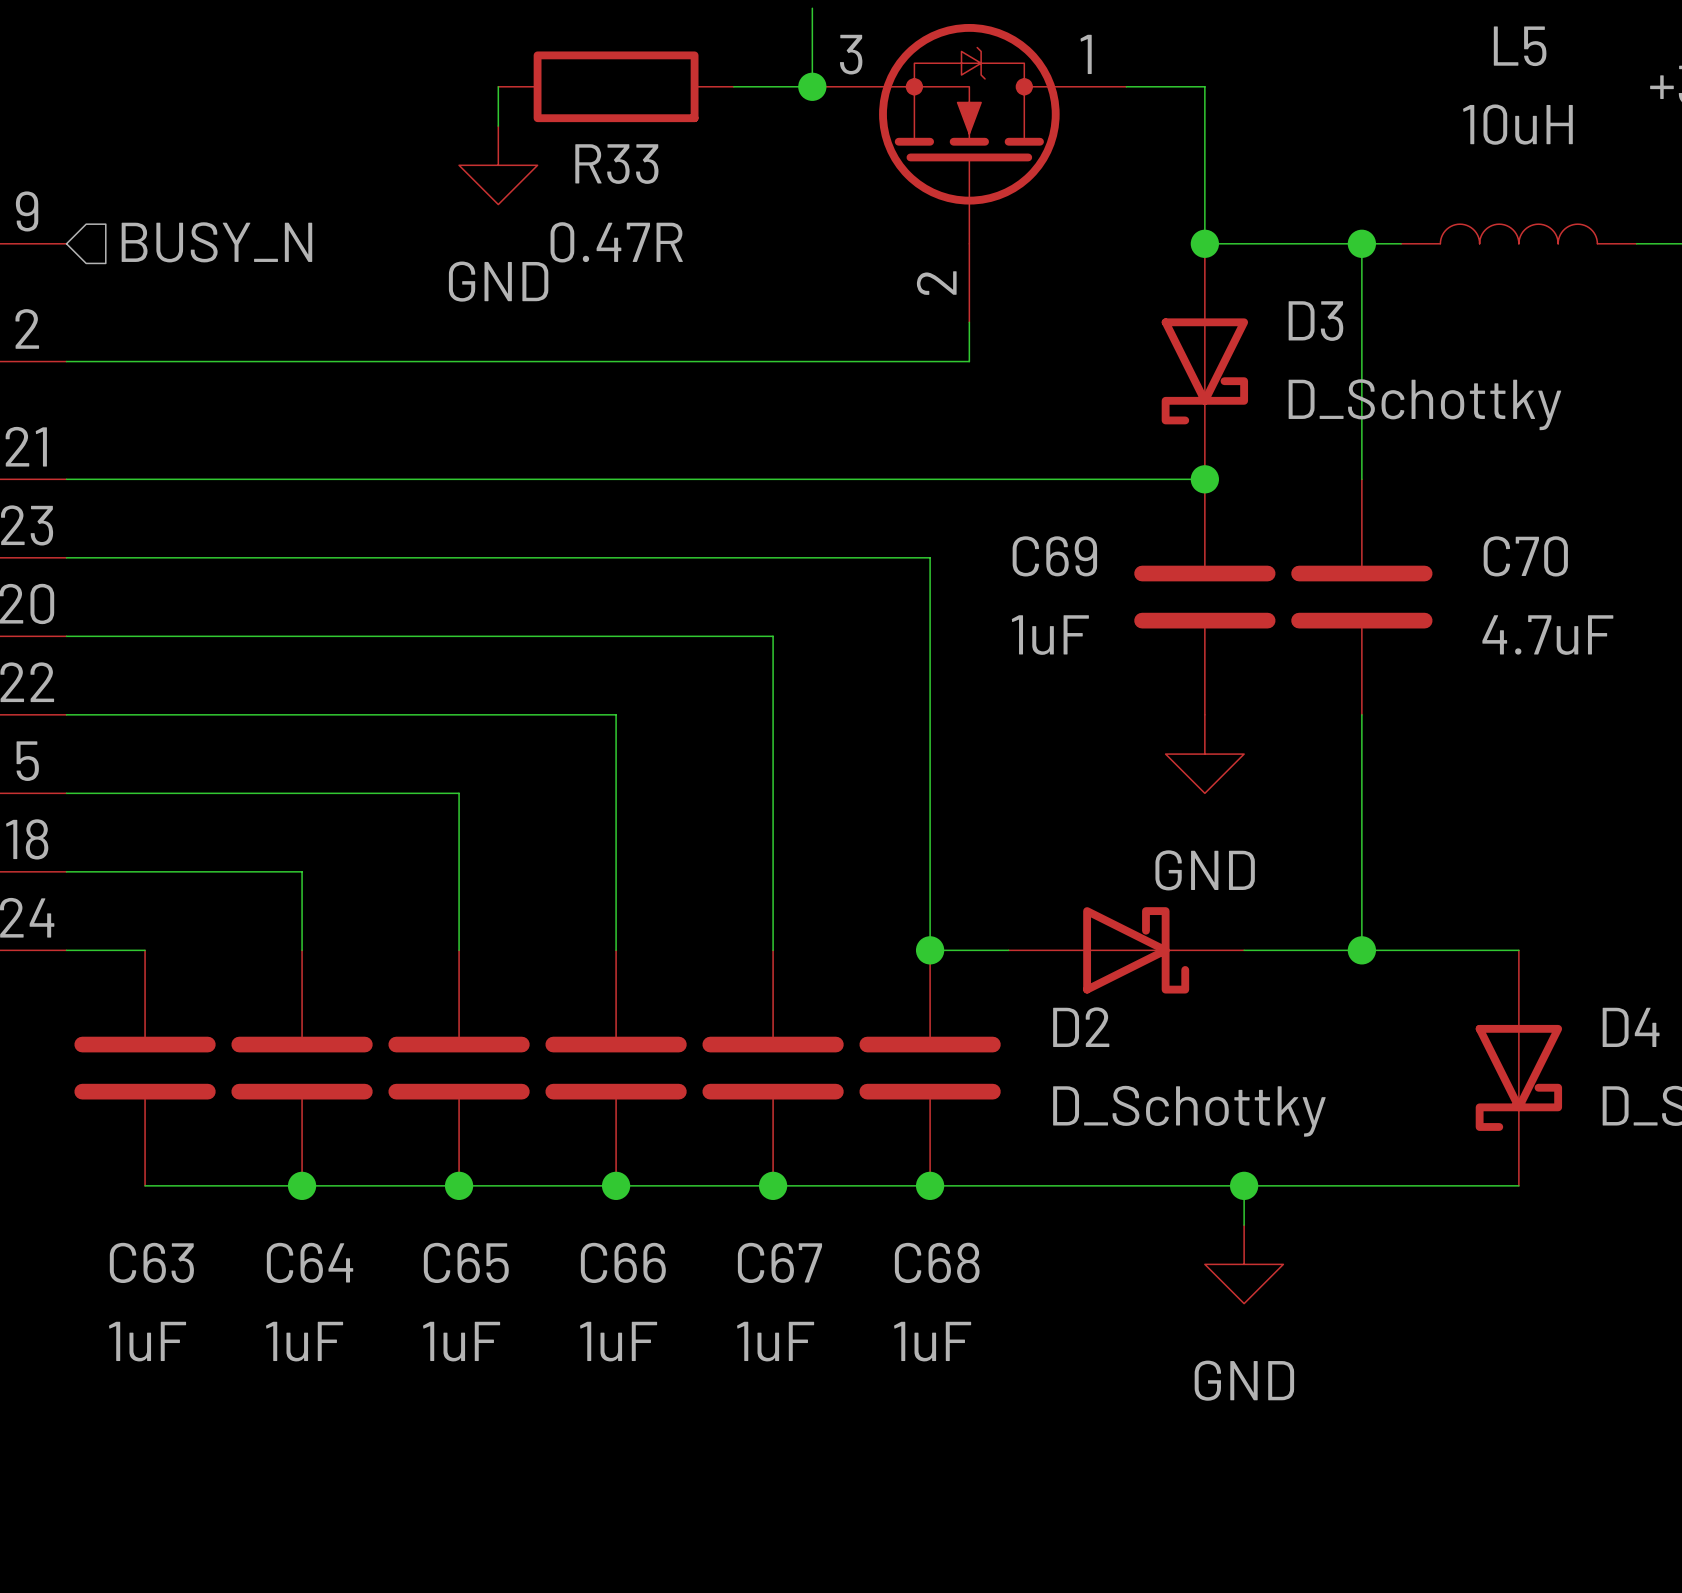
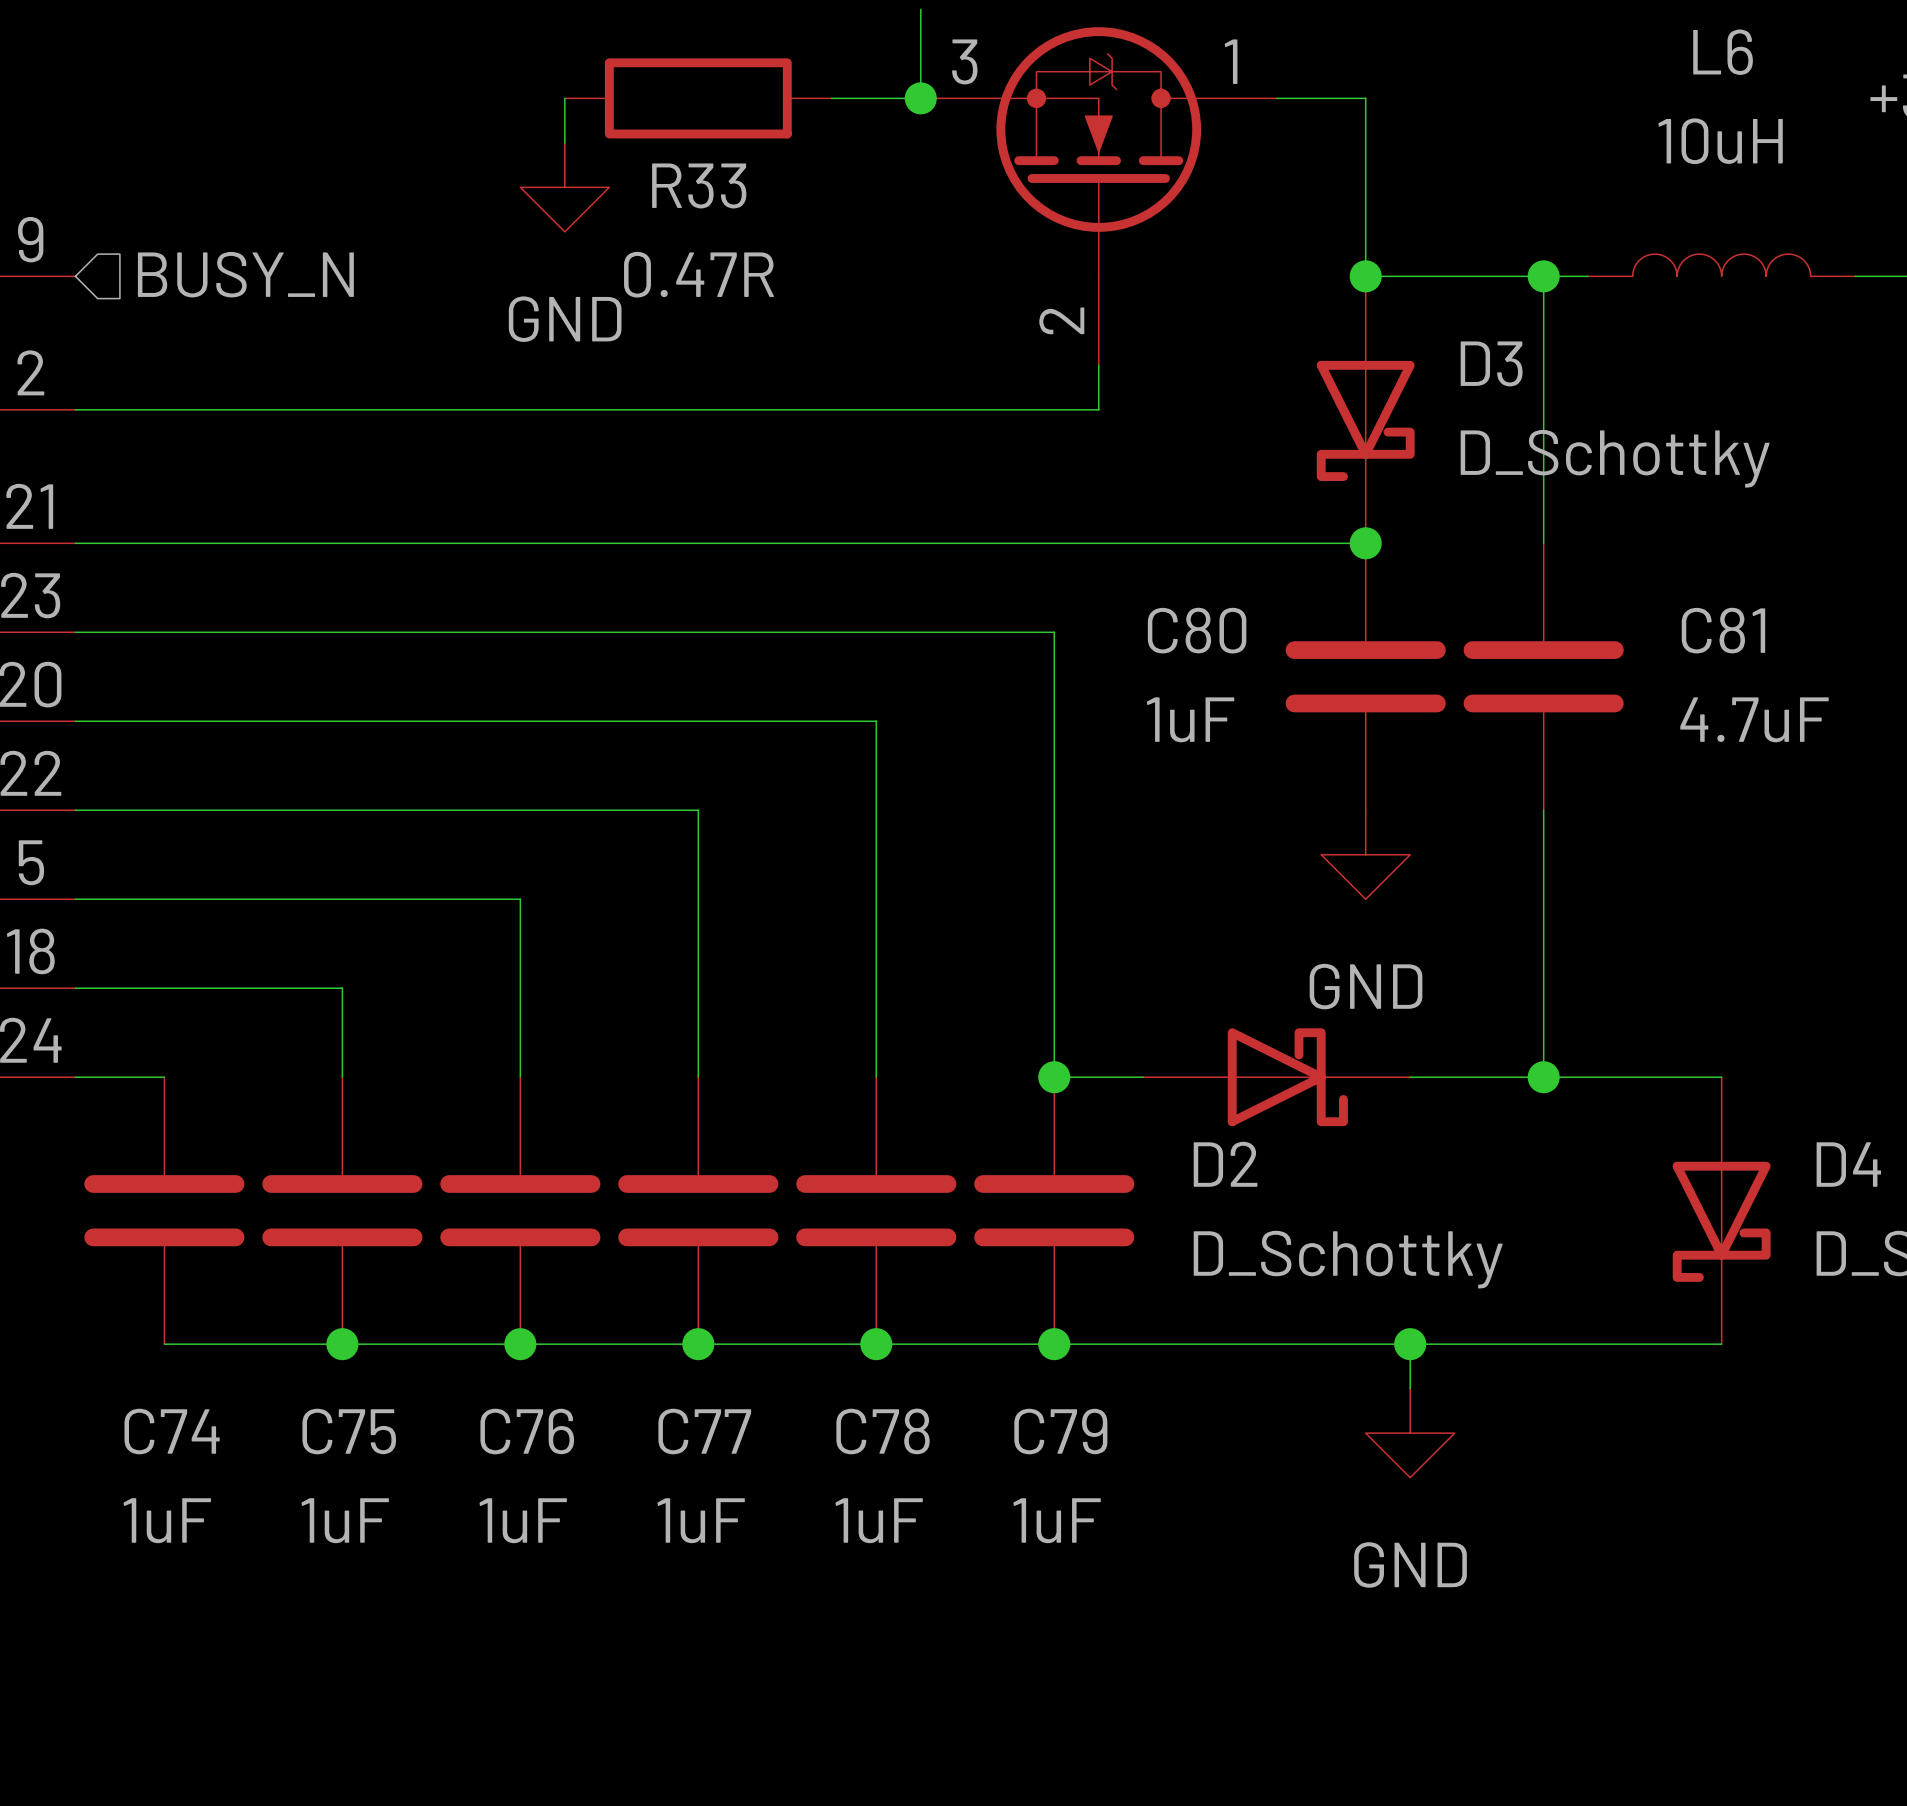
L5 name: L5 (1520, 46) -> L6 (1723, 52)
C69 name: C69 (1054, 556) -> C80 (1197, 630)
C70 name: C70 (1525, 556) -> C81 (1723, 630)
C63 name: C63 (151, 1262) -> C74 (172, 1431)
C64 name: C64 (310, 1262) -> C75 (349, 1431)
C65 name: C65 (466, 1262) -> C76 (527, 1431)
C66 name: C66 (623, 1262) -> C77 (704, 1431)
C67 name: C67 (779, 1262) -> C78 (883, 1431)
C68 name: C68 (937, 1262) -> C79 (1060, 1431)

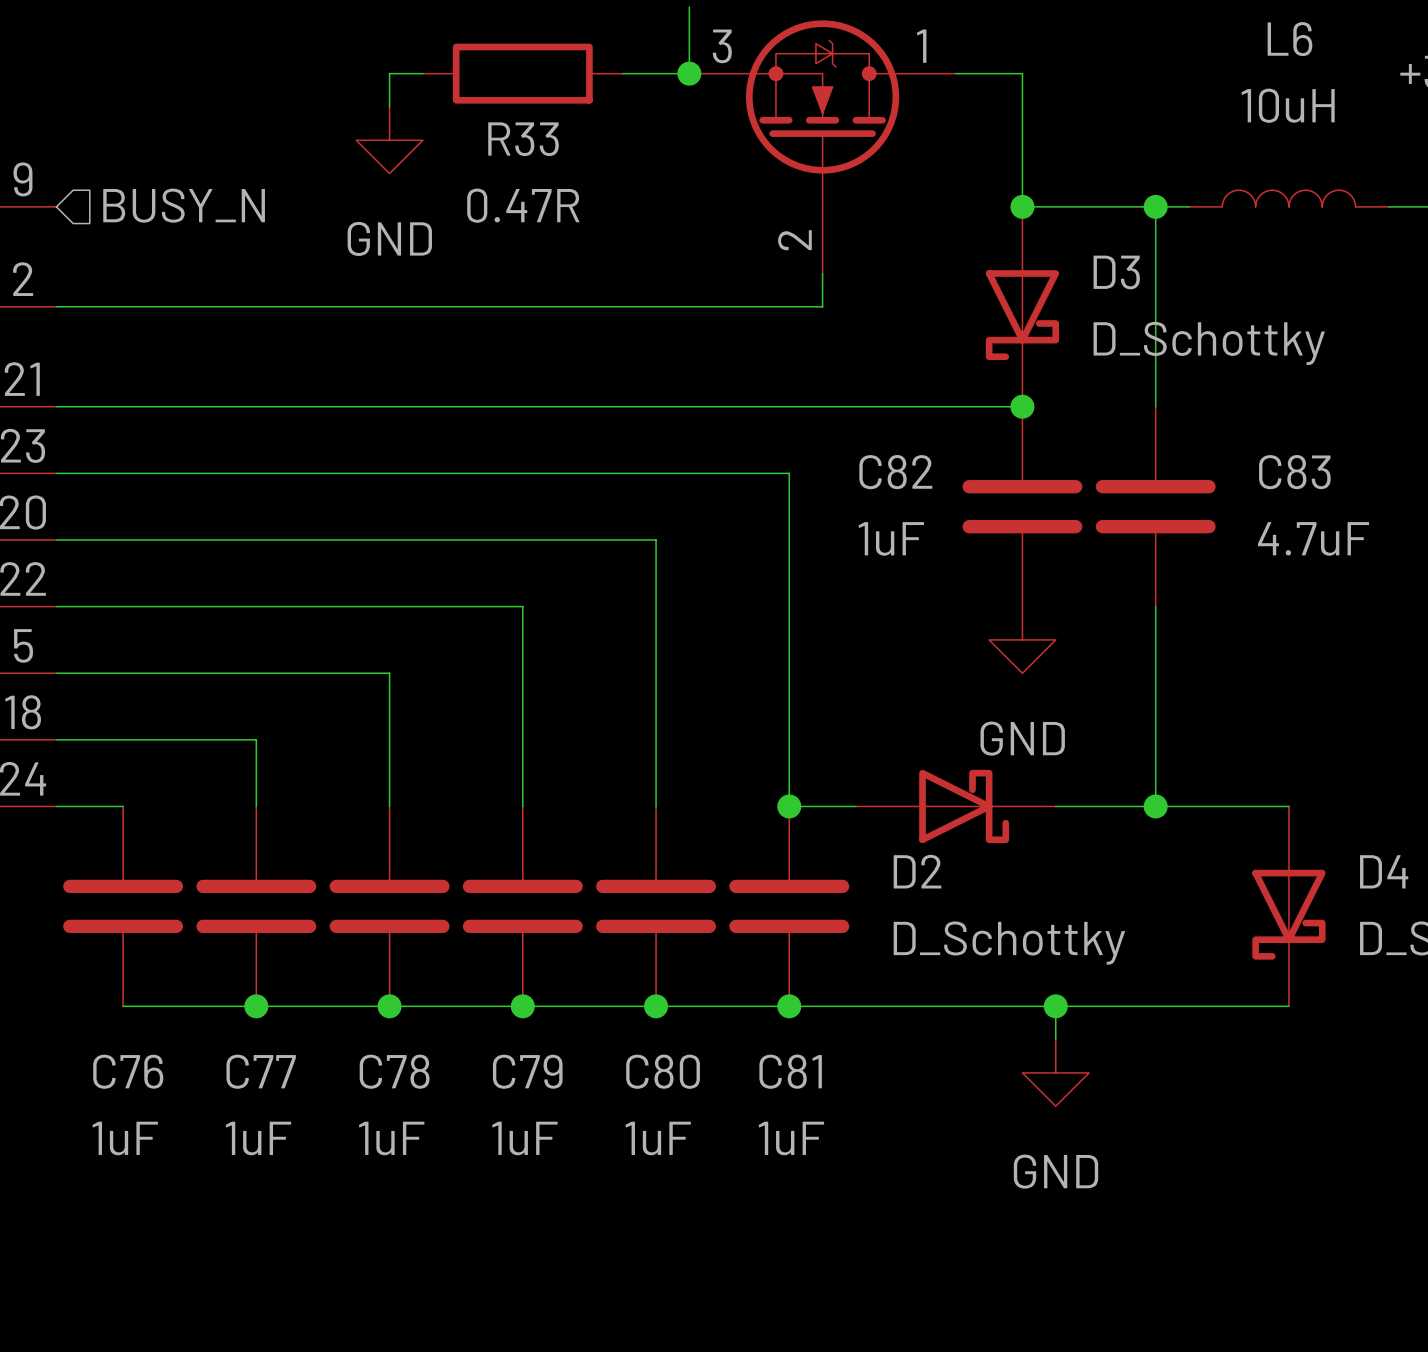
wire: (564, 98) (564, 142) -> (422, 73) (389, 73) (389, 106)
power symbol position: GND (564, 187) -> GND (389, 140)
C80 name: C80 (1197, 630) -> C82 (895, 472)
C81 name: C81 (1723, 630) -> C83 (1294, 472)
C74 name: C74 (172, 1431) -> C76 (128, 1071)
C75 name: C75 (349, 1431) -> C77 (261, 1071)
C76 name: C76 (527, 1431) -> C78 (394, 1071)
C77 name: C77 (704, 1431) -> C79 (527, 1071)
C78 name: C78 (883, 1431) -> C80 (663, 1071)
C79 name: C79 (1060, 1431) -> C81 (790, 1071)

